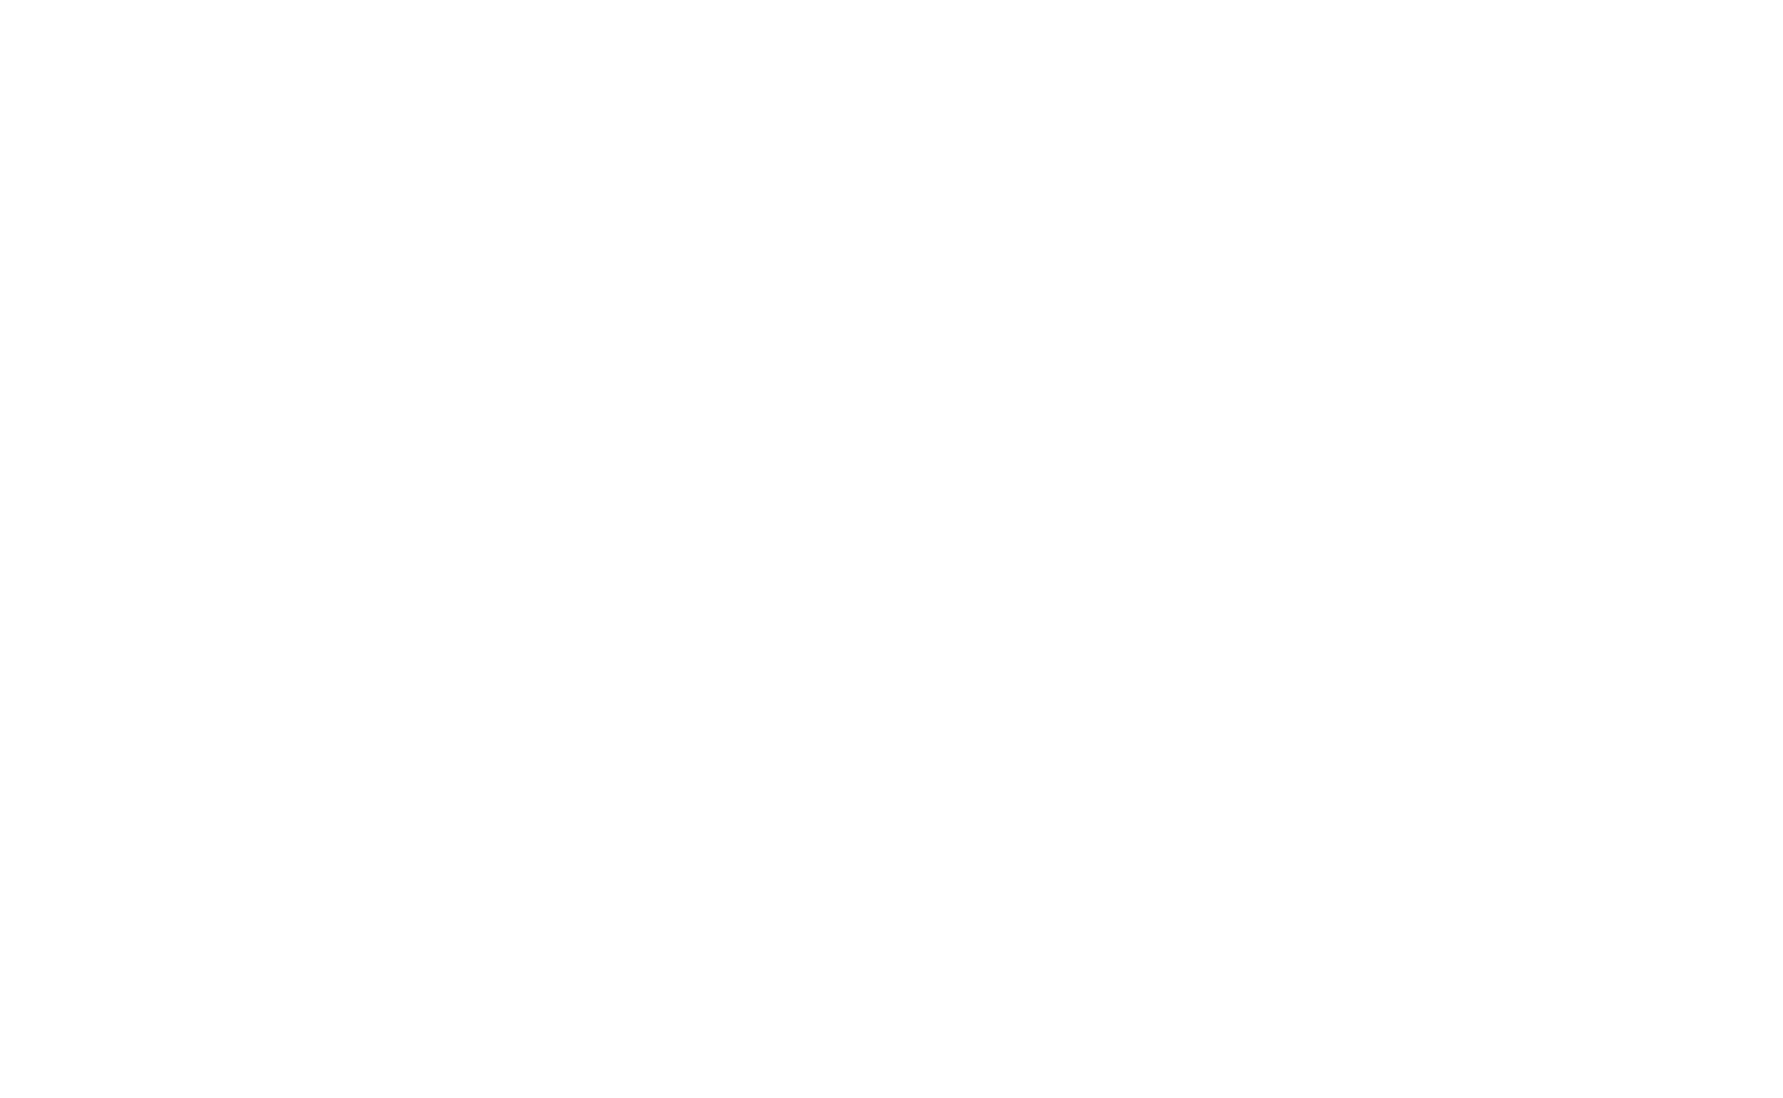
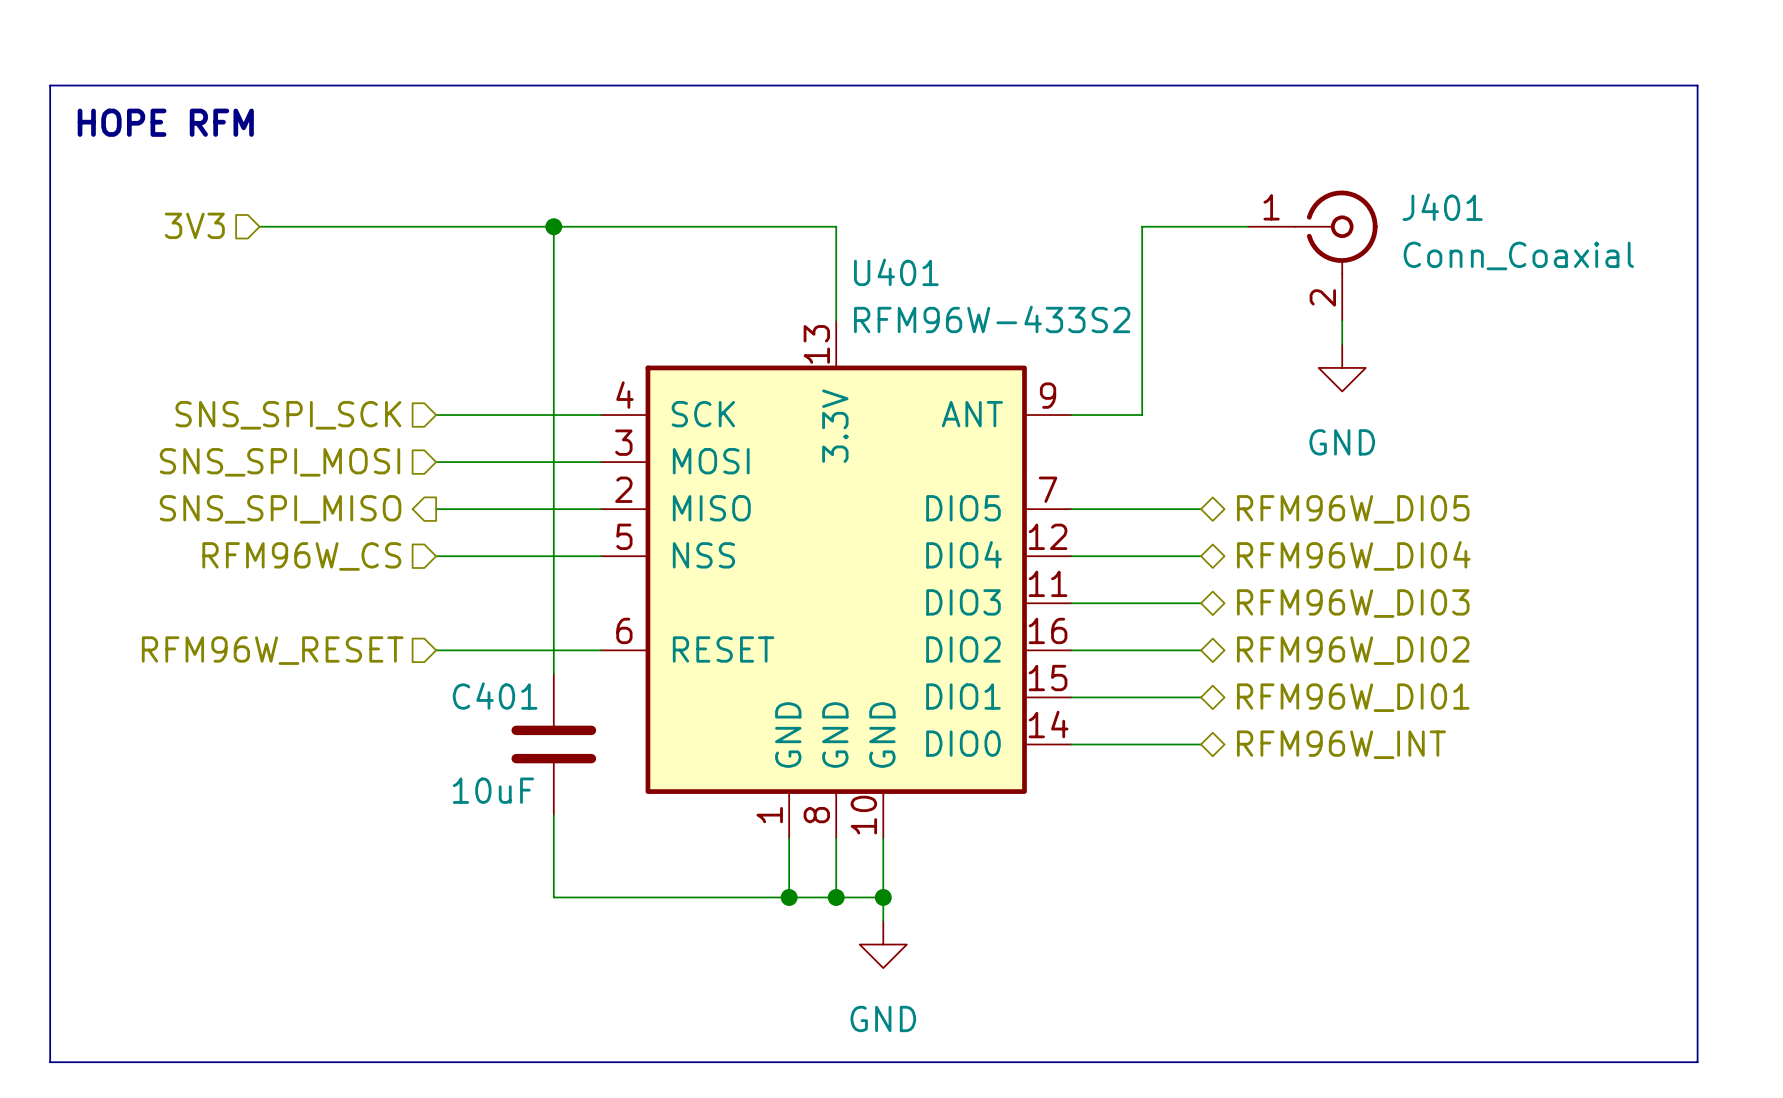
line: none -> (50, 85) (1697, 85) (1697, 1062) (50, 1062) (50, 85)
text: none -> HOPE RFM (165, 122)
hierarchical label: none -> 3V3 (194, 225)
wire: none -> (259, 226) (836, 226) (836, 320)
wire: none -> (553, 226) (553, 673)
junction: none -> (553, 226)
wire: none -> (1248, 226) (1142, 226) (1142, 415) (1071, 415)
J401: none -> Conn_Coaxial (1312, 255)
wire: none -> (1342, 320) (1342, 344)
power symbol: none -> GND (1342, 367)
hierarchical label: none -> SNS_SPI_SCK (288, 415)
wire: none -> (436, 415) (600, 415)
hierarchical label: none -> SNS_SPI_MOSI (279, 462)
wire: none -> (436, 462) (600, 462)
hierarchical label: none -> SNS_SPI_MISO (280, 509)
wire: none -> (436, 509) (600, 509)
wire: none -> (1071, 509) (1201, 509)
hierarchical label: none -> RFM96W_DI05 (1353, 509)
hierarchical label: none -> RFM96W_DI04 (1353, 555)
hierarchical label: none -> RFM96W_CS (301, 556)
wire: none -> (436, 556) (600, 556)
wire: none -> (1071, 556) (1201, 556)
U401: none -> RFM96W-433S2 (836, 579)
wire: none -> (1071, 603) (1201, 603)
hierarchical label: none -> RFM96W_DI03 (1353, 603)
hierarchical label: none -> RFM96W_RESET (272, 650)
wire: none -> (436, 650) (600, 650)
wire: none -> (1071, 650) (1201, 650)
hierarchical label: none -> RFM96W_DI02 (1353, 650)
wire: none -> (1071, 697) (1201, 697)
hierarchical label: none -> RFM96W_DI01 (1353, 697)
C401: none -> 10uF (553, 744)
wire: none -> (1071, 744) (1201, 744)
hierarchical label: none -> RFM96W_INT (1341, 744)
wire: none -> (553, 815) (553, 897) (883, 897)
wire: none -> (789, 838) (789, 897)
wire: none -> (836, 838) (836, 897)
wire: none -> (883, 838) (883, 921)
junction: none -> (789, 897)
junction: none -> (836, 897)
junction: none -> (883, 897)
power symbol: none -> GND (883, 944)

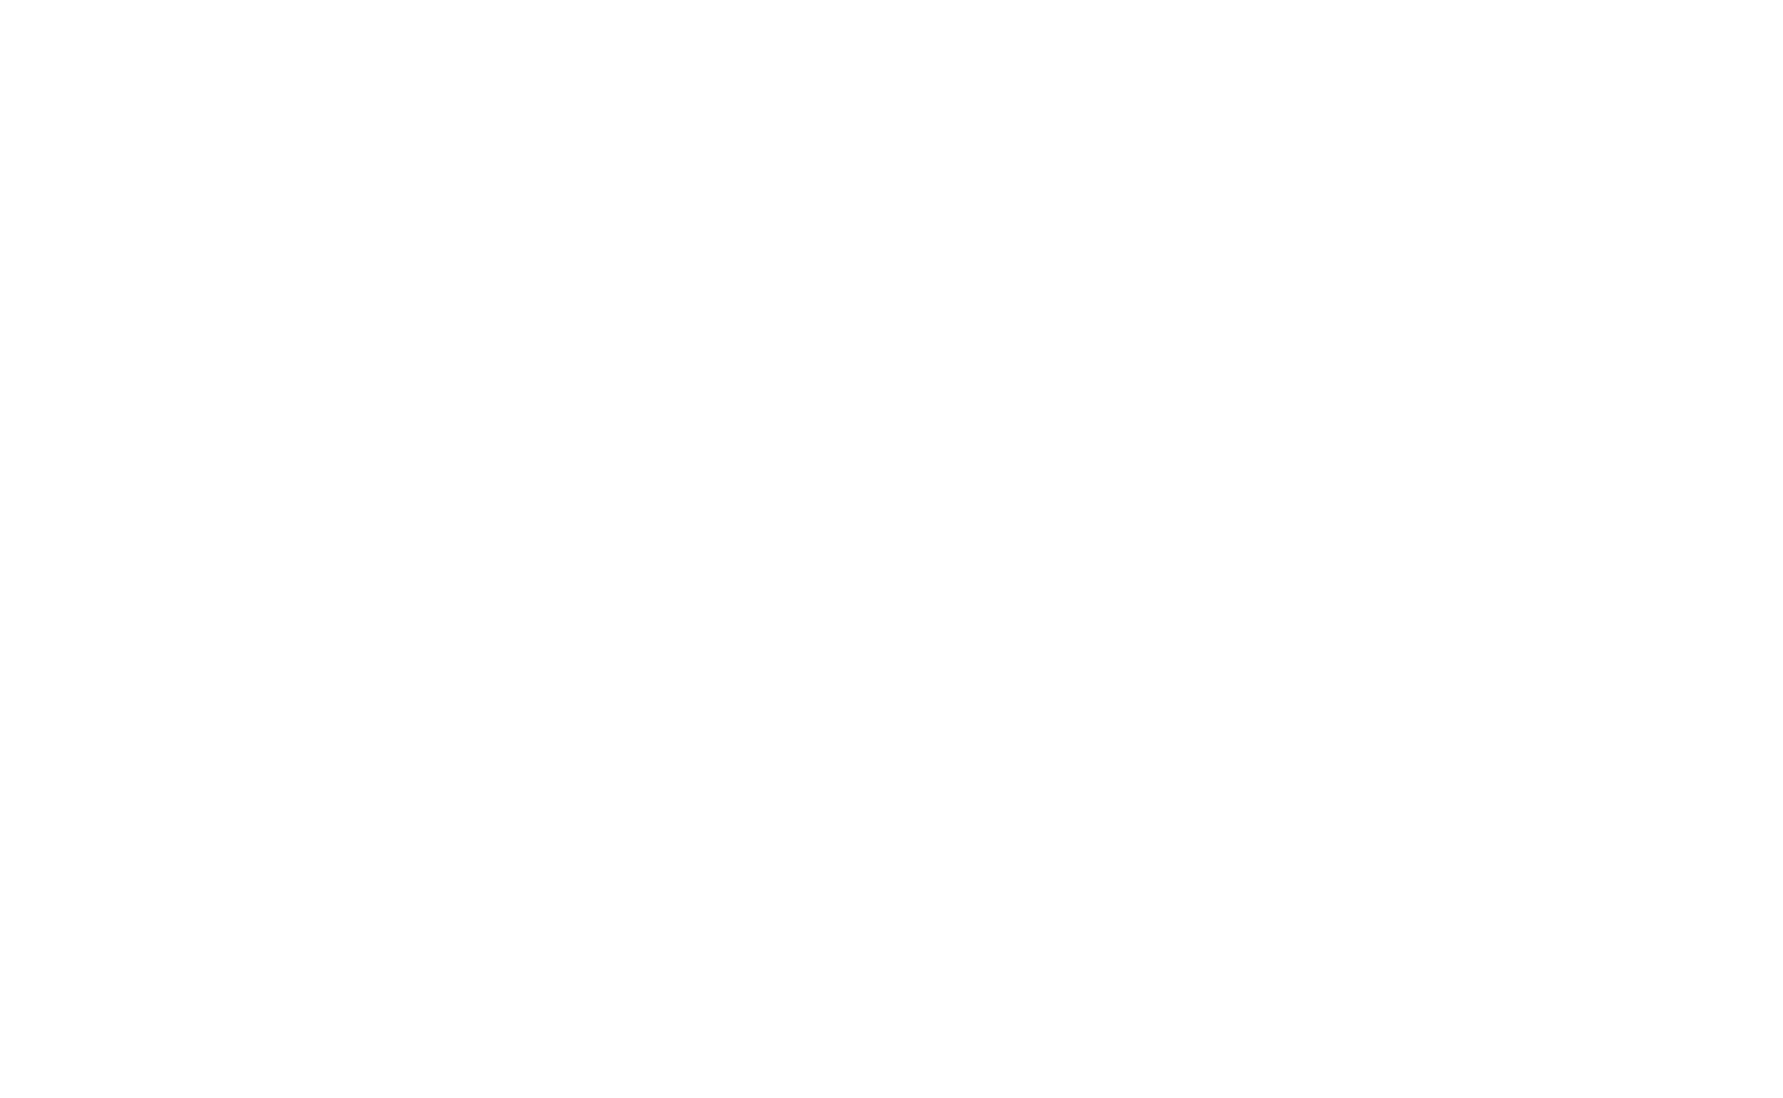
line: (50, 85) (1697, 85) (1697, 1062) (50, 1062) (50, 85) -> none
text: HOPE RFM (165, 122) -> none
hierarchical label: 3V3 (194, 225) -> none
wire: (259, 226) (836, 226) (836, 320) -> none
wire: (553, 226) (553, 673) -> none
junction: (553, 226) -> none
wire: (1248, 226) (1142, 226) (1142, 415) (1071, 415) -> none
J401: Conn_Coaxial (1312, 255) -> none
wire: (1342, 320) (1342, 344) -> none
power symbol: GND (1342, 367) -> none
hierarchical label: SNS_SPI_SCK (288, 415) -> none
wire: (436, 415) (600, 415) -> none
hierarchical label: SNS_SPI_MOSI (279, 462) -> none
wire: (436, 462) (600, 462) -> none
hierarchical label: SNS_SPI_MISO (280, 509) -> none
wire: (436, 509) (600, 509) -> none
wire: (1071, 509) (1201, 509) -> none
hierarchical label: RFM96W_DI05 (1353, 509) -> none
hierarchical label: RFM96W_DI04 (1353, 555) -> none
hierarchical label: RFM96W_CS (301, 556) -> none
wire: (436, 556) (600, 556) -> none
wire: (1071, 556) (1201, 556) -> none
U401: RFM96W-433S2 (836, 579) -> none
wire: (1071, 603) (1201, 603) -> none
hierarchical label: RFM96W_DI03 (1353, 603) -> none
hierarchical label: RFM96W_RESET (272, 650) -> none
wire: (436, 650) (600, 650) -> none
wire: (1071, 650) (1201, 650) -> none
hierarchical label: RFM96W_DI02 (1353, 650) -> none
wire: (1071, 697) (1201, 697) -> none
hierarchical label: RFM96W_DI01 (1353, 697) -> none
C401: 10uF (553, 744) -> none
wire: (1071, 744) (1201, 744) -> none
hierarchical label: RFM96W_INT (1341, 744) -> none
wire: (553, 815) (553, 897) (883, 897) -> none
wire: (789, 838) (789, 897) -> none
wire: (836, 838) (836, 897) -> none
wire: (883, 838) (883, 921) -> none
junction: (789, 897) -> none
junction: (836, 897) -> none
junction: (883, 897) -> none
power symbol: GND (883, 944) -> none

